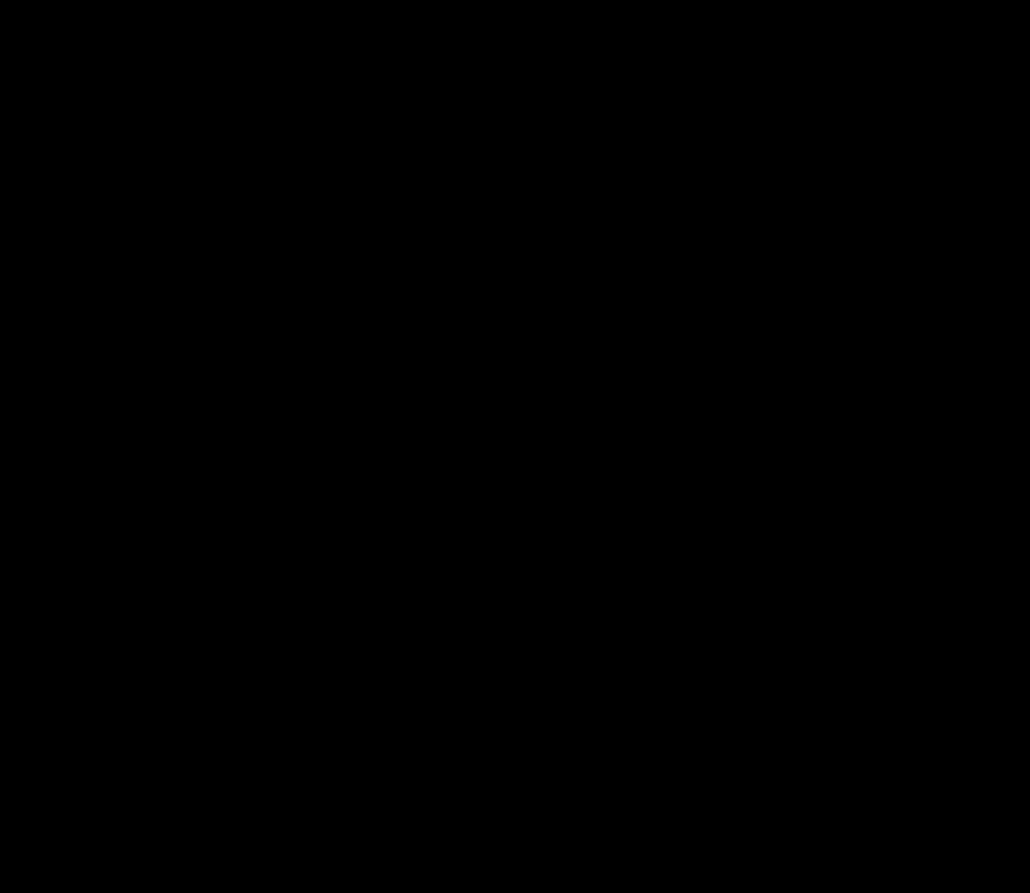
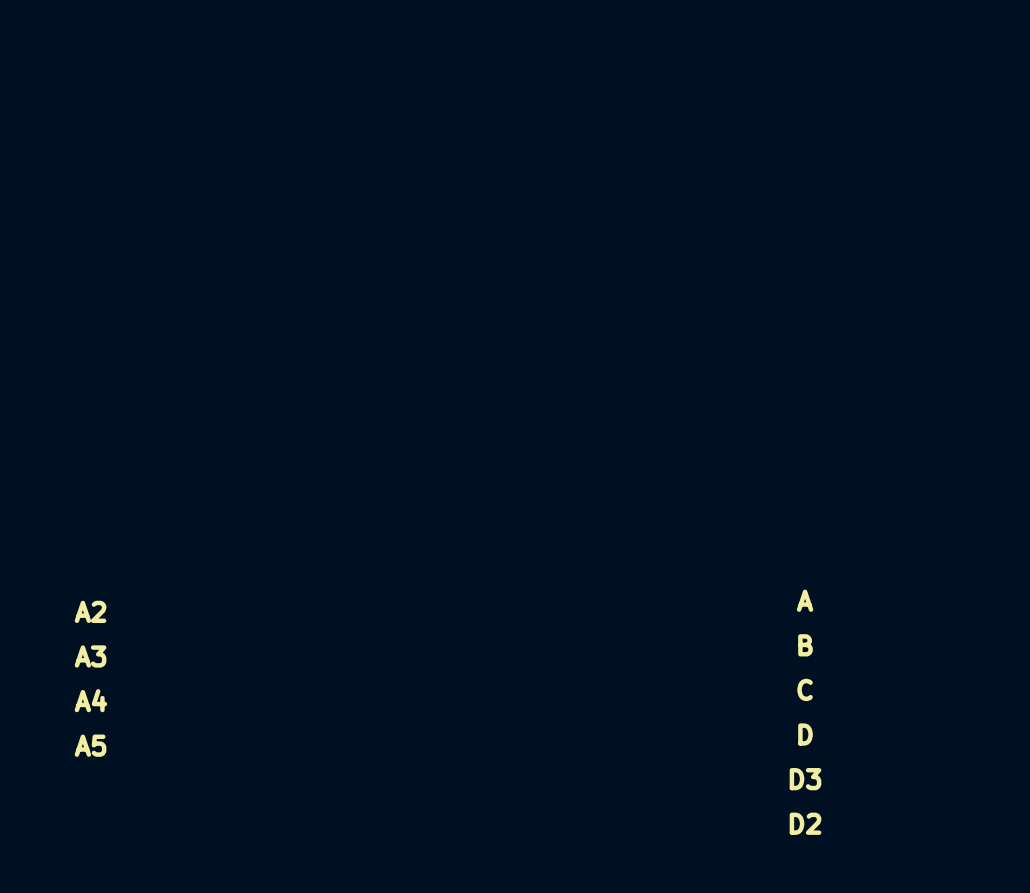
text: none -> A (805, 600)
text: none -> A2 (90, 611)
text: none -> B (805, 645)
text: none -> A3 (90, 656)
text: none -> C (805, 689)
text: none -> A4 (90, 700)
text: none -> D (805, 734)
text: none -> A5 (90, 745)
text: none -> D3 (805, 779)
text: none -> D2 (805, 823)

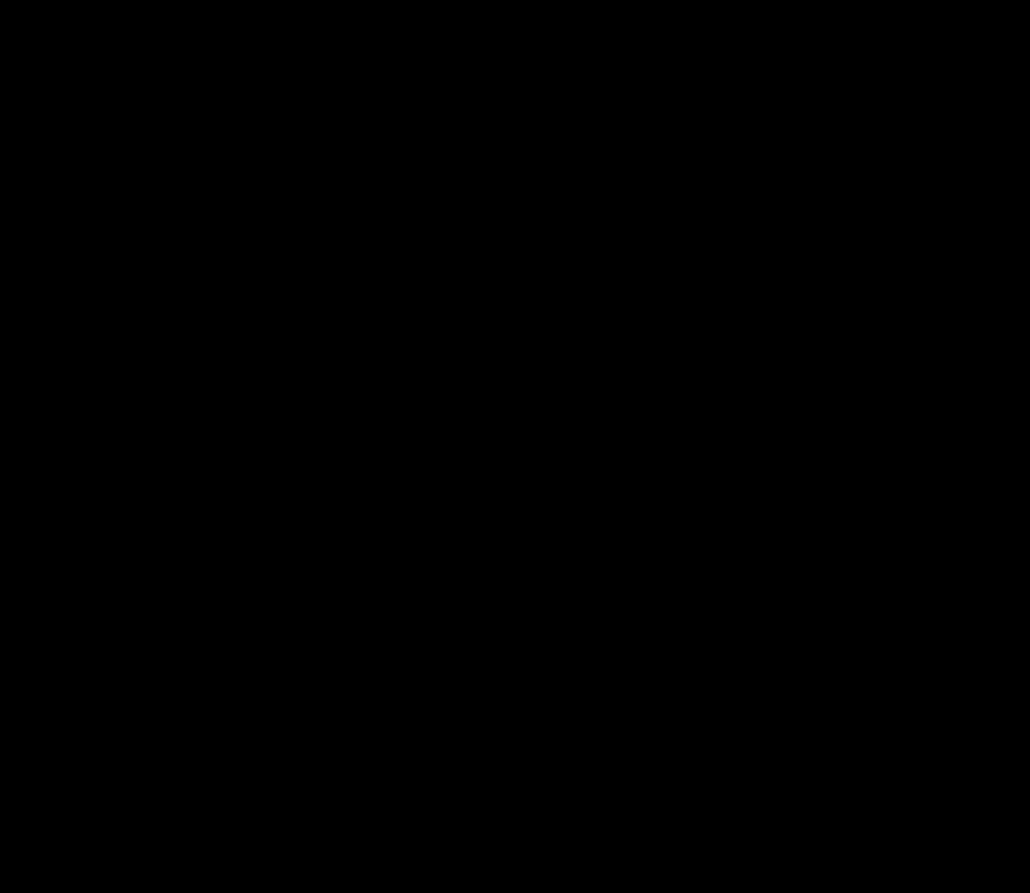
text: A (805, 600) -> none
text: A2 (90, 611) -> none
text: B (805, 645) -> none
text: A3 (90, 656) -> none
text: C (805, 689) -> none
text: A4 (90, 700) -> none
text: D (805, 734) -> none
text: A5 (90, 745) -> none
text: D3 (805, 779) -> none
text: D2 (805, 823) -> none

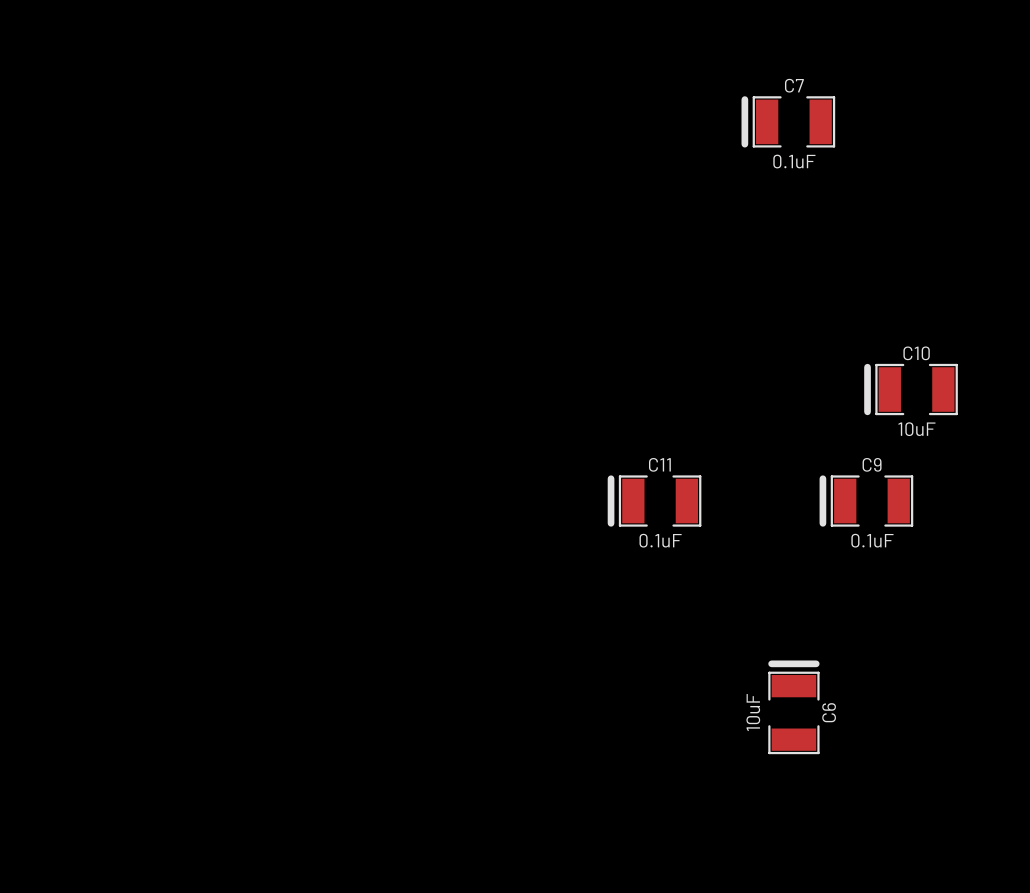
C7: none -> 0.1uF (788, 121)
C10: none -> 10uF (911, 389)
C11: none -> 0.1uF (654, 501)
C9: none -> 0.1uF (866, 501)
C6: none -> 10uF (793, 707)

